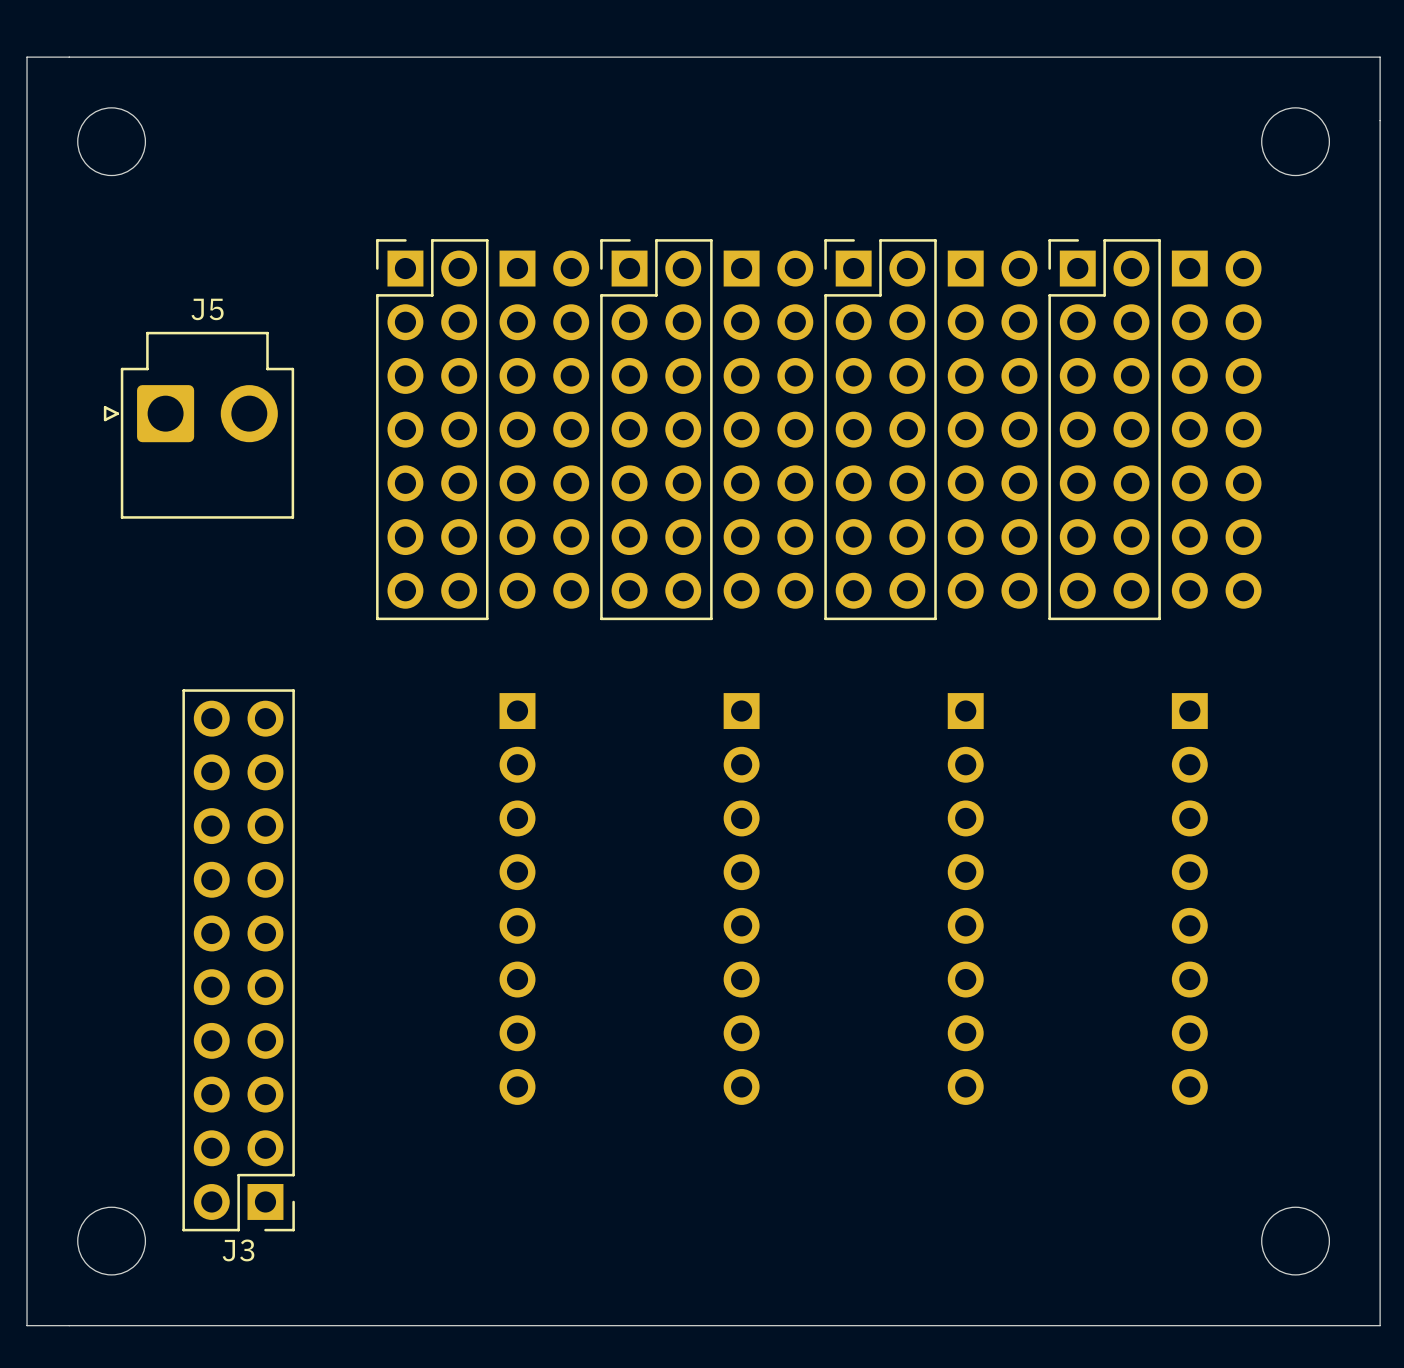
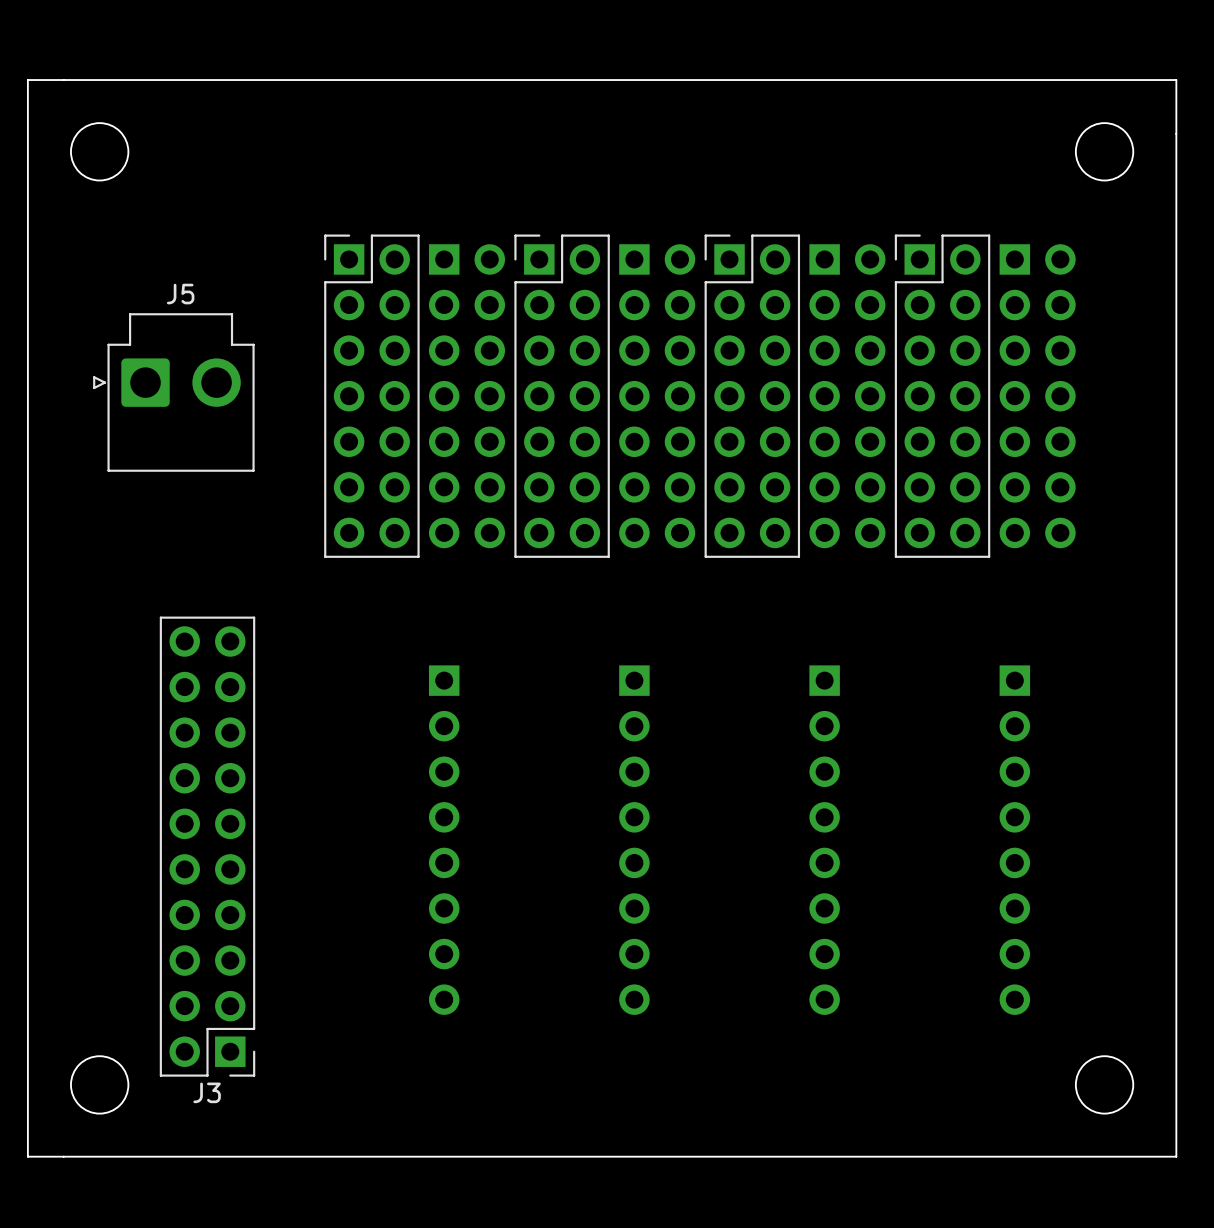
part position: (517, 898) -> (444, 840)
part position: (741, 898) -> (634, 840)
part position: (965, 898) -> (824, 840)
part position: (1189, 898) -> (1014, 840)

